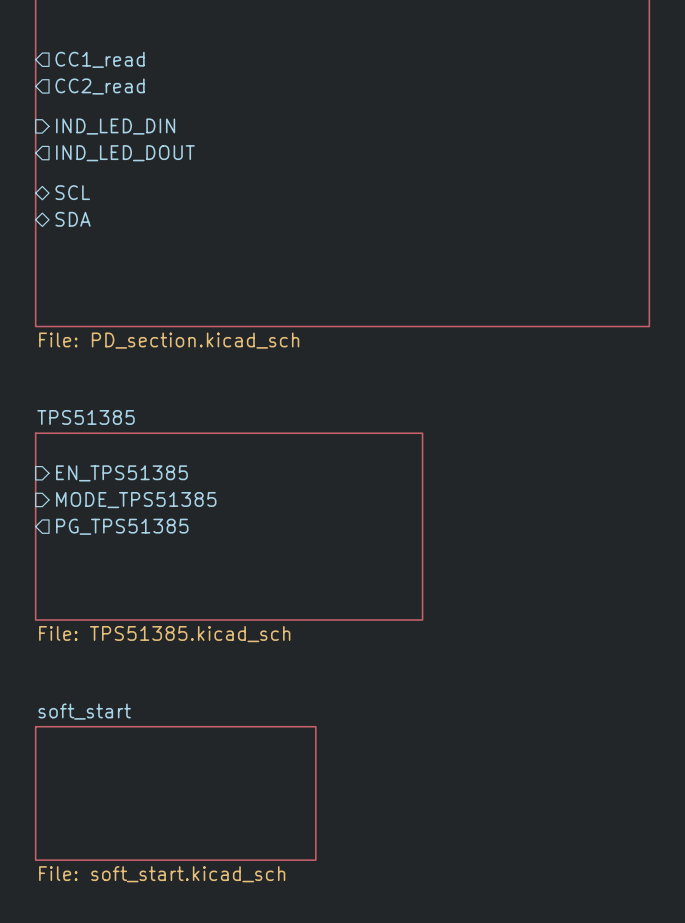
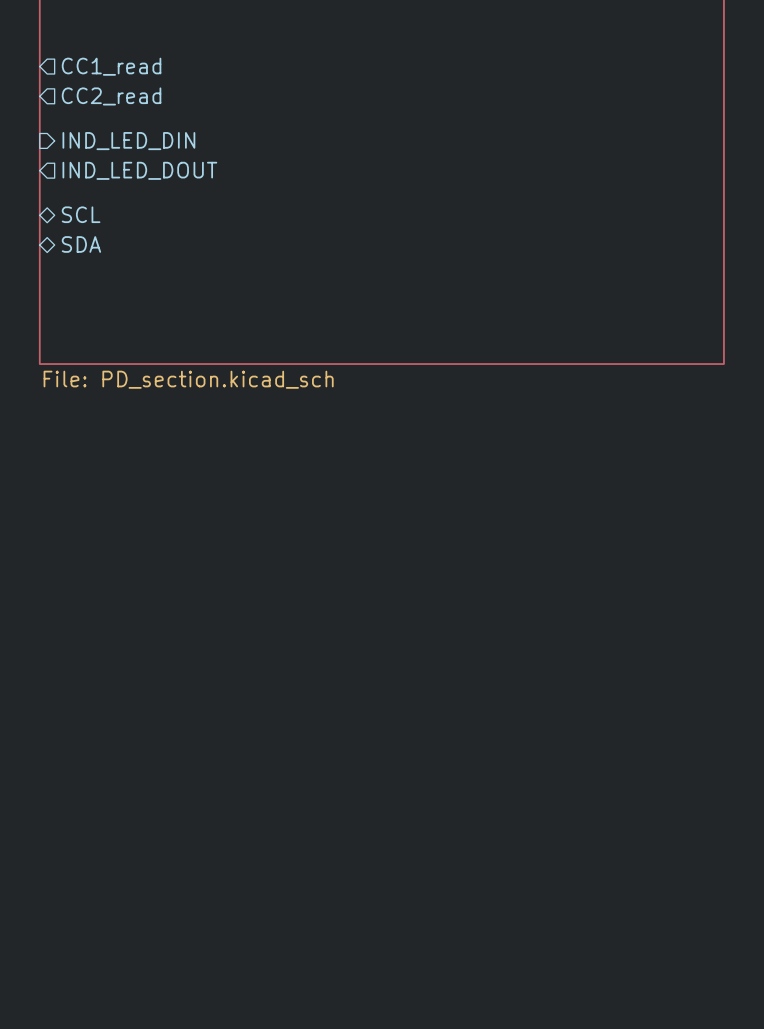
sheet pin: EN_TPS51385 (121, 473) -> none
sheet pin: MODE_TPS51385 (136, 500) -> none
sheet pin: PG_TPS51385 (122, 526) -> none
sheet TPS51385: File: TPS51385.kicad_sch (229, 526) -> none
sheet soft_start: File: soft_start.kicad_sch (175, 793) -> none

